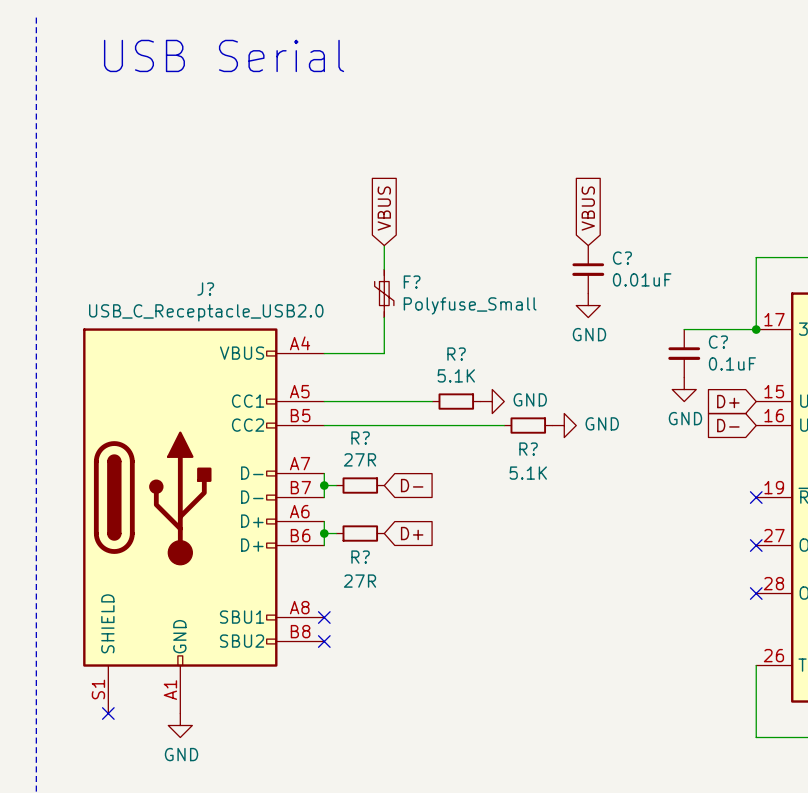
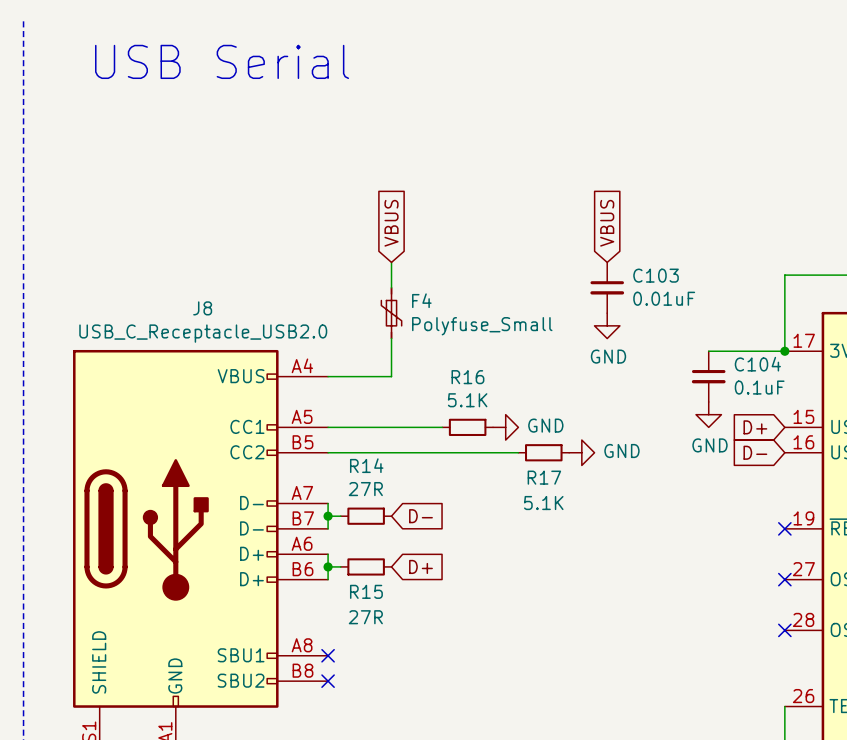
C? name: C? (622, 258) -> C103 (656, 275)
F? name: F? (412, 282) -> F4 (421, 300)
J? name: J? (205, 289) -> J8 (202, 308)
C? name: C? (718, 342) -> C104 (757, 364)
R? name: R? (456, 354) -> R16 (467, 377)
R? name: R? (360, 438) -> R14 (366, 465)
R? name: R? (528, 449) -> R17 (544, 477)
R? name: R? (360, 557) -> R15 (366, 591)

